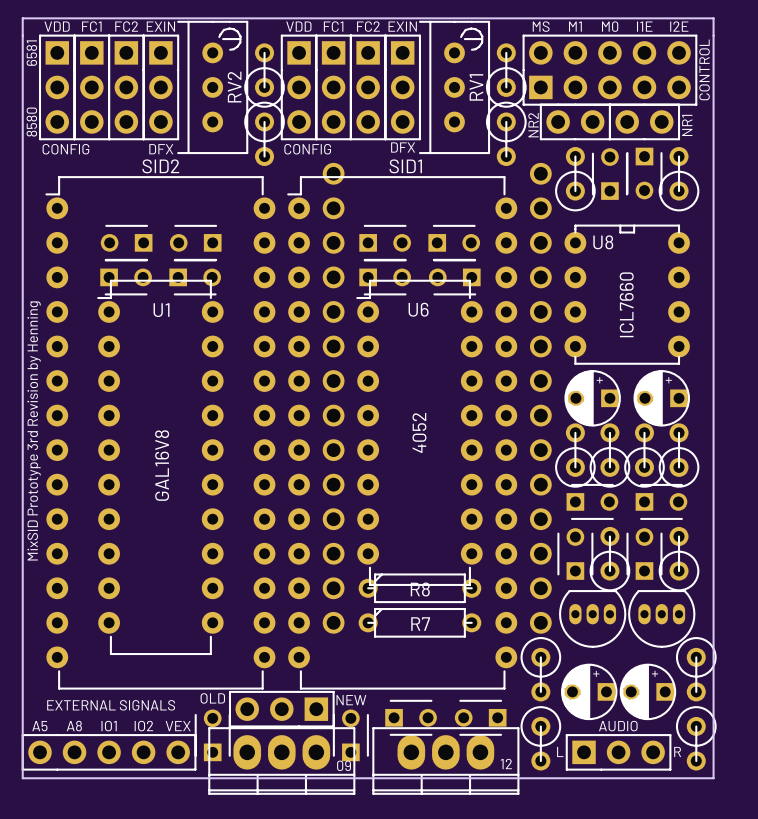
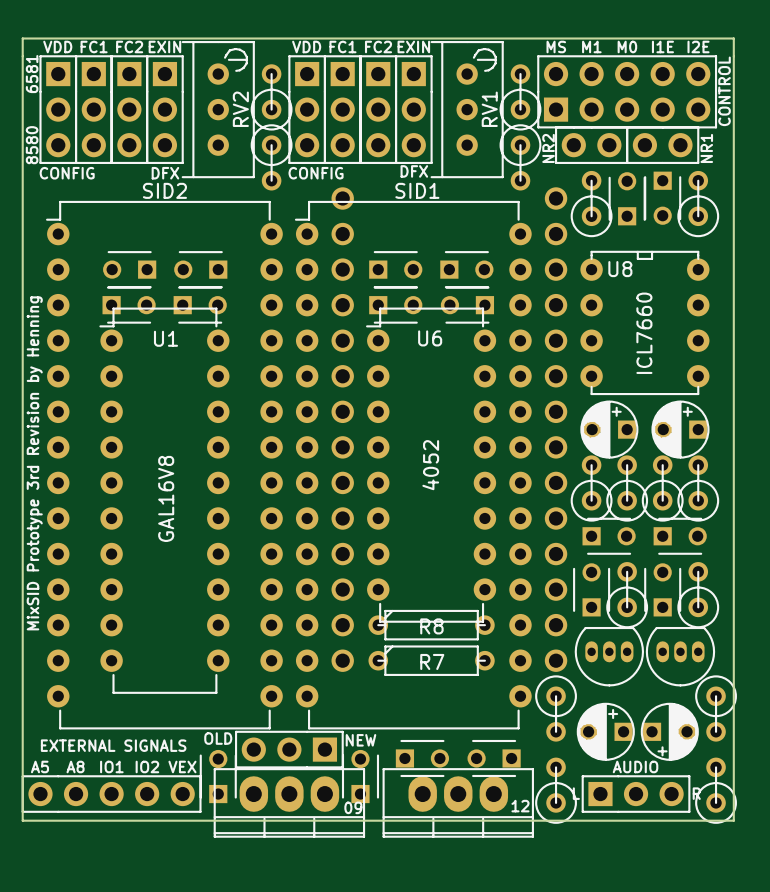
part rotation: 0° (647, 691) -> 180° (669, 731)
part rotation: 0° (540, 738) -> 180° (556, 790)
part rotation: 0° (696, 738) -> 180° (716, 790)

